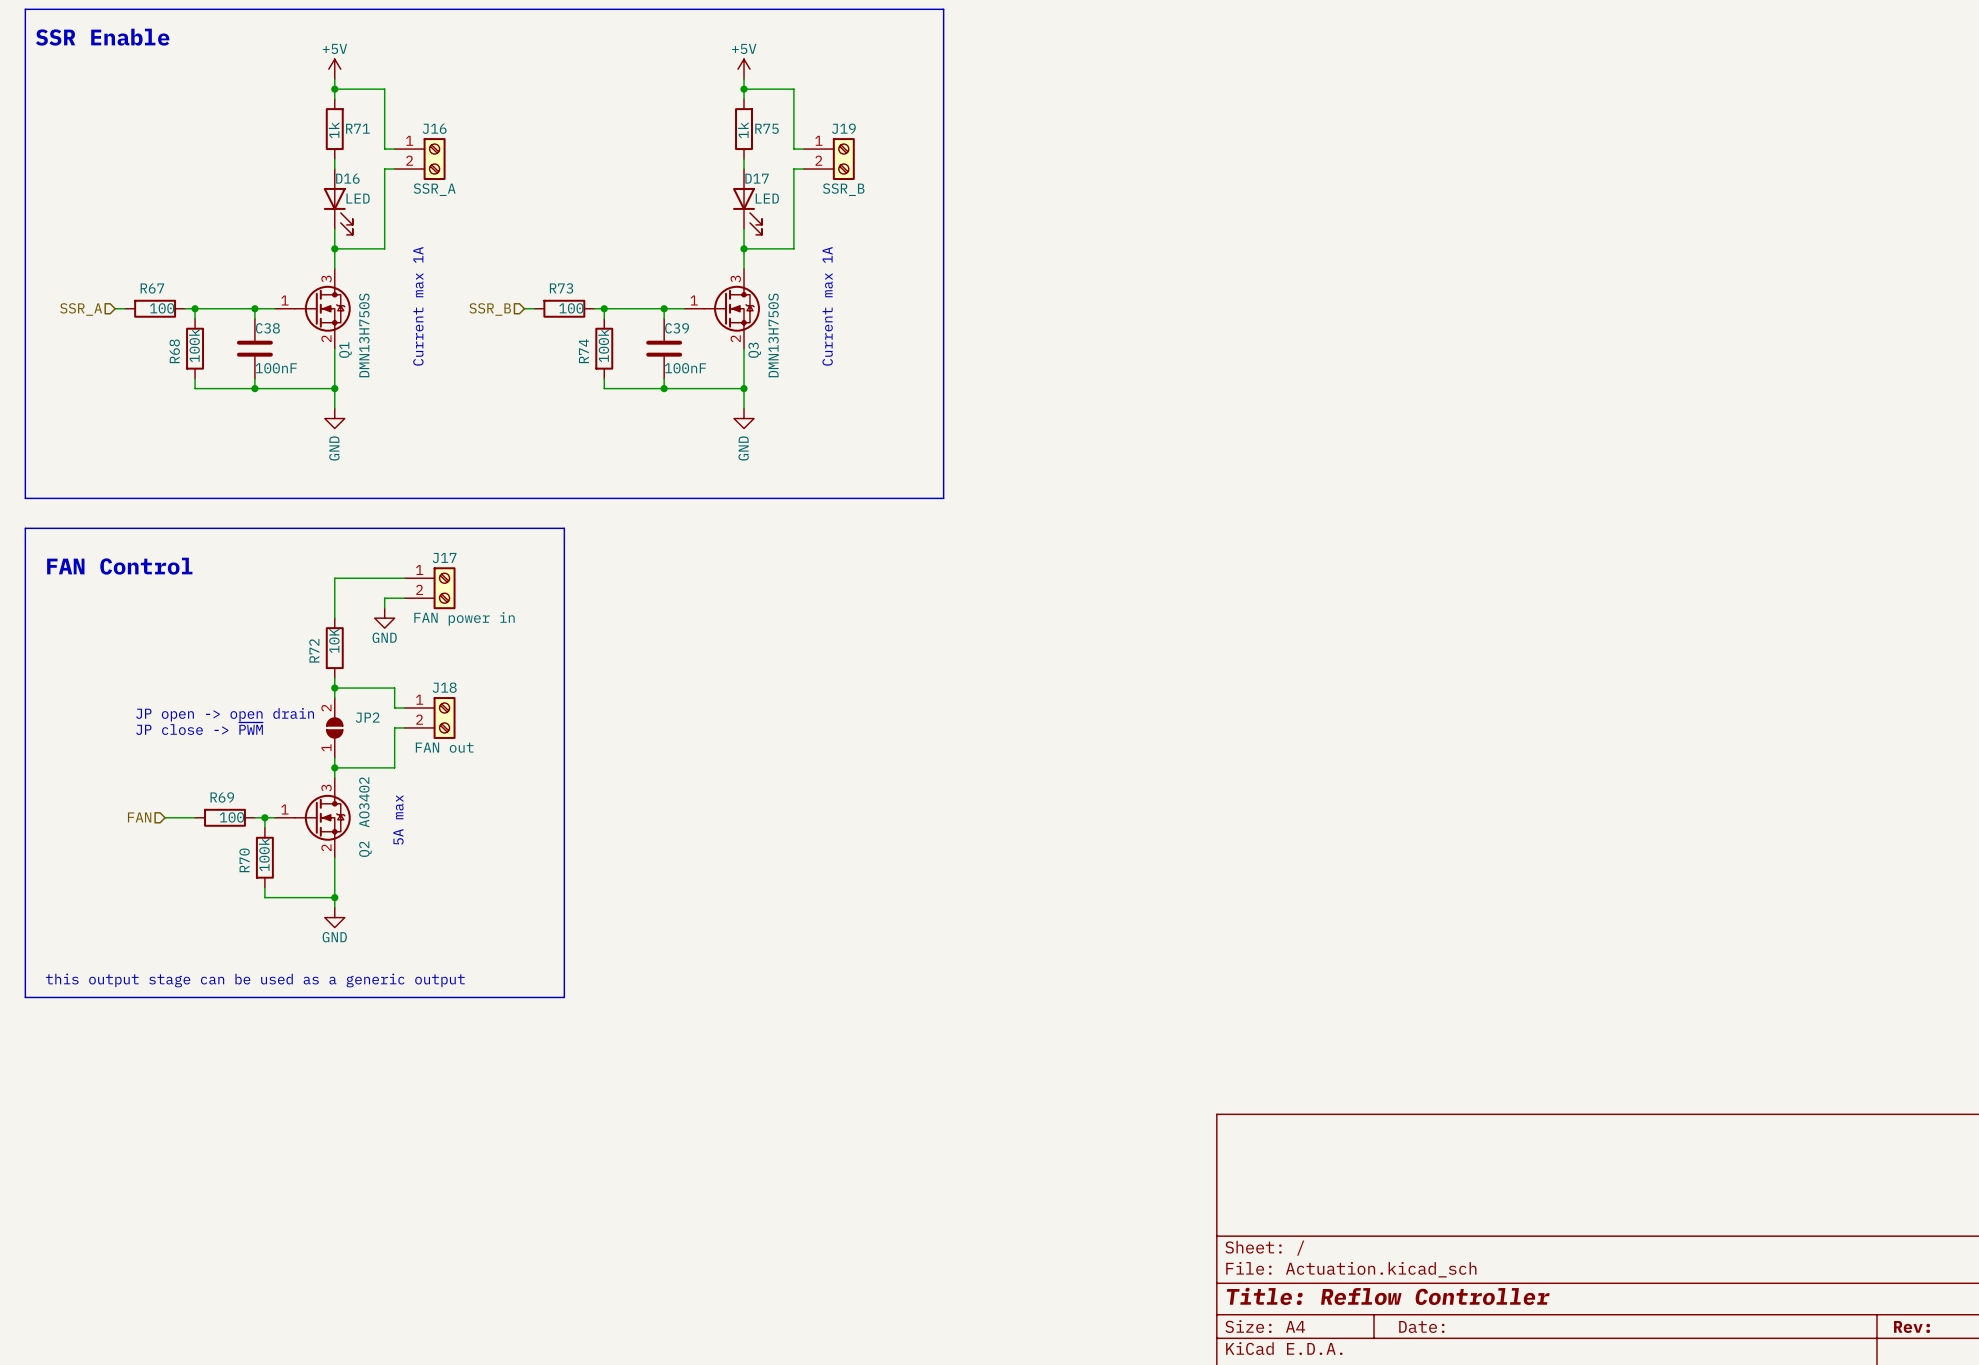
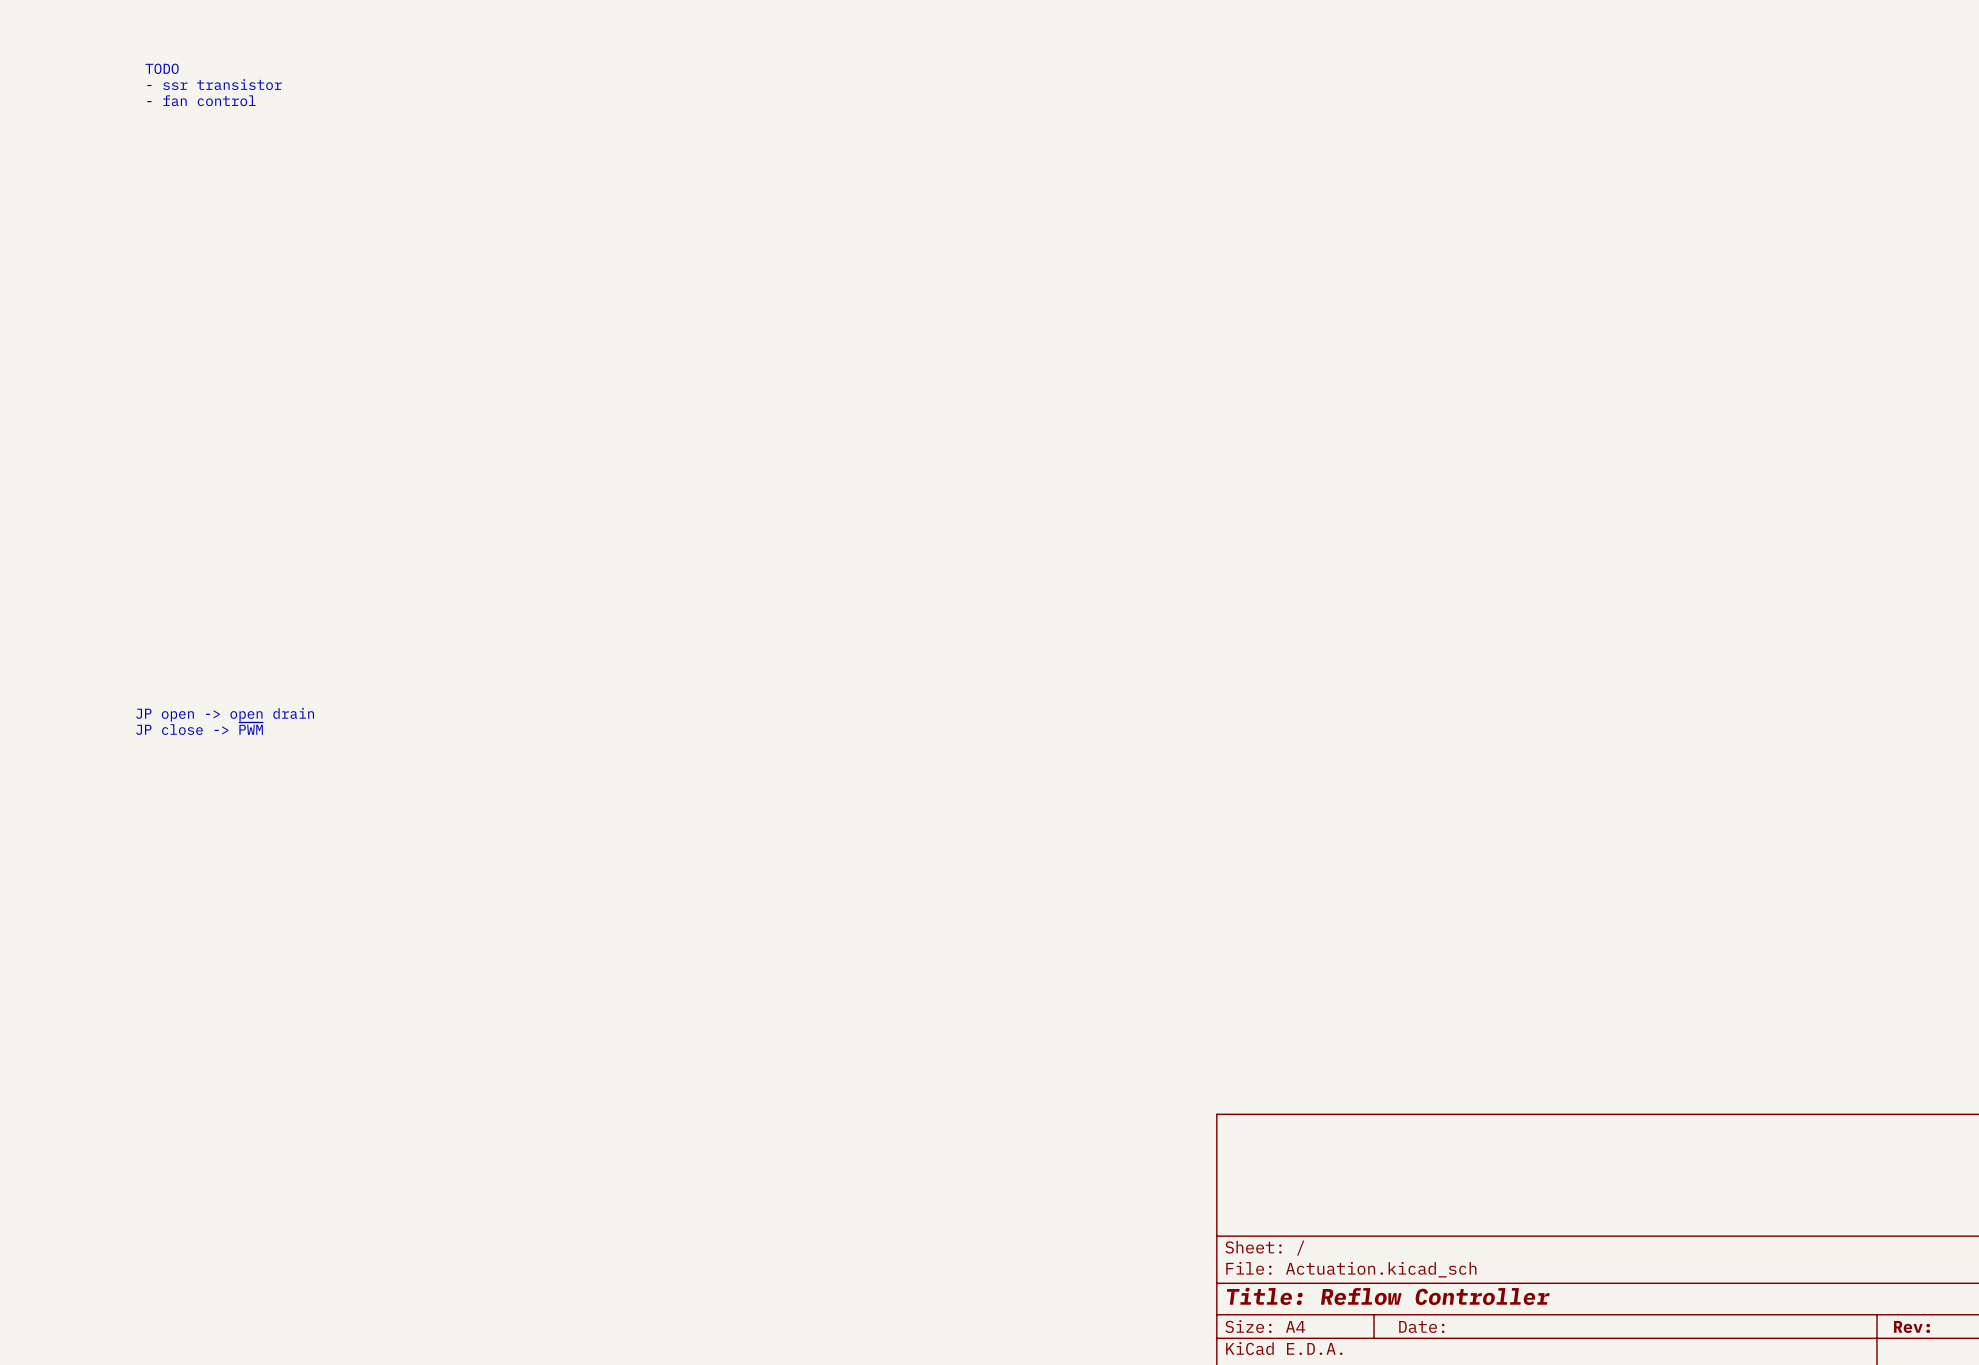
line: (25, 9) (943, 9) (943, 498) (25, 498) (25, 9) -> none
text: SSR Enable (102, 37) -> none
text: none -> TODO (162, 68)
power symbol: +5V (334, 69) -> none
power symbol: +5V (744, 69) -> none
wire: (334, 79) (334, 99) -> none
wire: (744, 79) (744, 99) -> none
text: none -> - ssr transistor (214, 84)
wire: (334, 89) (384, 89) (384, 149) (394, 149) -> none
junction: (334, 89) -> none
wire: (744, 89) (793, 89) (793, 149) (803, 149) -> none
junction: (744, 89) -> none
text: none -> - fan control (201, 100)
R71: 1k (334, 129) -> none
R75: 1k (744, 129) -> none
wire: (334, 159) (334, 169) -> none
J16: SSR_A (420, 159) -> none
wire: (744, 159) (744, 169) -> none
J19: SSR_B (829, 159) -> none
wire: (394, 169) (384, 169) (384, 248) (334, 248) -> none
wire: (803, 169) (793, 169) (793, 248) (744, 248) -> none
D16: LED (338, 201) -> none
D17: LED (747, 201) -> none
wire: (334, 228) (334, 268) -> none
wire: (744, 228) (744, 268) -> none
junction: (334, 248) -> none
junction: (744, 248) -> none
text: Current max 1A (418, 306) -> none
text: Current max 1A (827, 306) -> none
wire: (115, 308) (125, 308) -> none
R67: 100 (155, 308) -> none
wire: (185, 308) (274, 308) -> none
wire: (195, 308) (195, 318) -> none
junction: (195, 308) -> none
wire: (254, 308) (254, 318) -> none
junction: (254, 308) -> none
Q1: DMN13H750S (312, 308) -> none
wire: (524, 308) (534, 308) -> none
R73: 100 (564, 308) -> none
wire: (594, 308) (684, 308) -> none
wire: (604, 308) (604, 318) -> none
junction: (604, 308) -> none
wire: (664, 308) (664, 318) -> none
junction: (664, 308) -> none
Q3: DMN13H750S (722, 308) -> none
hierarchical label: SSR_A (81, 309) -> none
hierarchical label: SSR_B (490, 309) -> none
R68: 100k (195, 348) -> none
C38: 100nF (254, 348) -> none
wire: (334, 348) (334, 408) -> none
R74: 100k (604, 348) -> none
C39: 100nF (664, 348) -> none
wire: (744, 348) (744, 408) -> none
wire: (195, 378) (195, 388) (334, 388) -> none
wire: (254, 378) (254, 388) -> none
wire: (604, 378) (604, 388) (744, 388) -> none
wire: (664, 378) (664, 388) -> none
junction: (254, 388) -> none
junction: (334, 388) -> none
junction: (664, 388) -> none
junction: (744, 388) -> none
power symbol: GND (334, 418) -> none
power symbol: GND (744, 418) -> none
line: (25, 528) (25, 997) (564, 997) (564, 528) (25, 528) -> none
text: FAN Control (119, 566) -> none
wire: (404, 578) (334, 578) (334, 618) -> none
J17: FAN power in (430, 588) -> none
wire: (404, 598) (384, 598) (384, 608) -> none
power symbol: GND (384, 618) -> none
R72: 10K (334, 648) -> none
wire: (334, 678) (334, 698) -> none
wire: (334, 688) (394, 688) (394, 708) (404, 708) -> none
junction: (334, 688) -> none
J18: FAN out (430, 717) -> none
JP2: (334, 727) -> none
wire: (404, 727) (394, 727) (394, 767) (334, 767) -> none
wire: (334, 757) (334, 777) -> none
junction: (334, 767) -> none
hierarchical label: FAN (139, 817) -> none
wire: (165, 817) (195, 817) -> none
R69: 100 (224, 817) -> none
wire: (254, 817) (274, 817) -> none
wire: (264, 817) (264, 827) -> none
junction: (264, 817) -> none
Q2: AO3402 (312, 817) -> none
text: 5A max (398, 819) -> none
R70: 100k (264, 857) -> none
wire: (334, 857) (334, 907) -> none
wire: (264, 887) (264, 897) (334, 897) -> none
junction: (334, 897) -> none
power symbol: GND (334, 917) -> none
text: this output stage can be used as a generic output (255, 980) -> none

